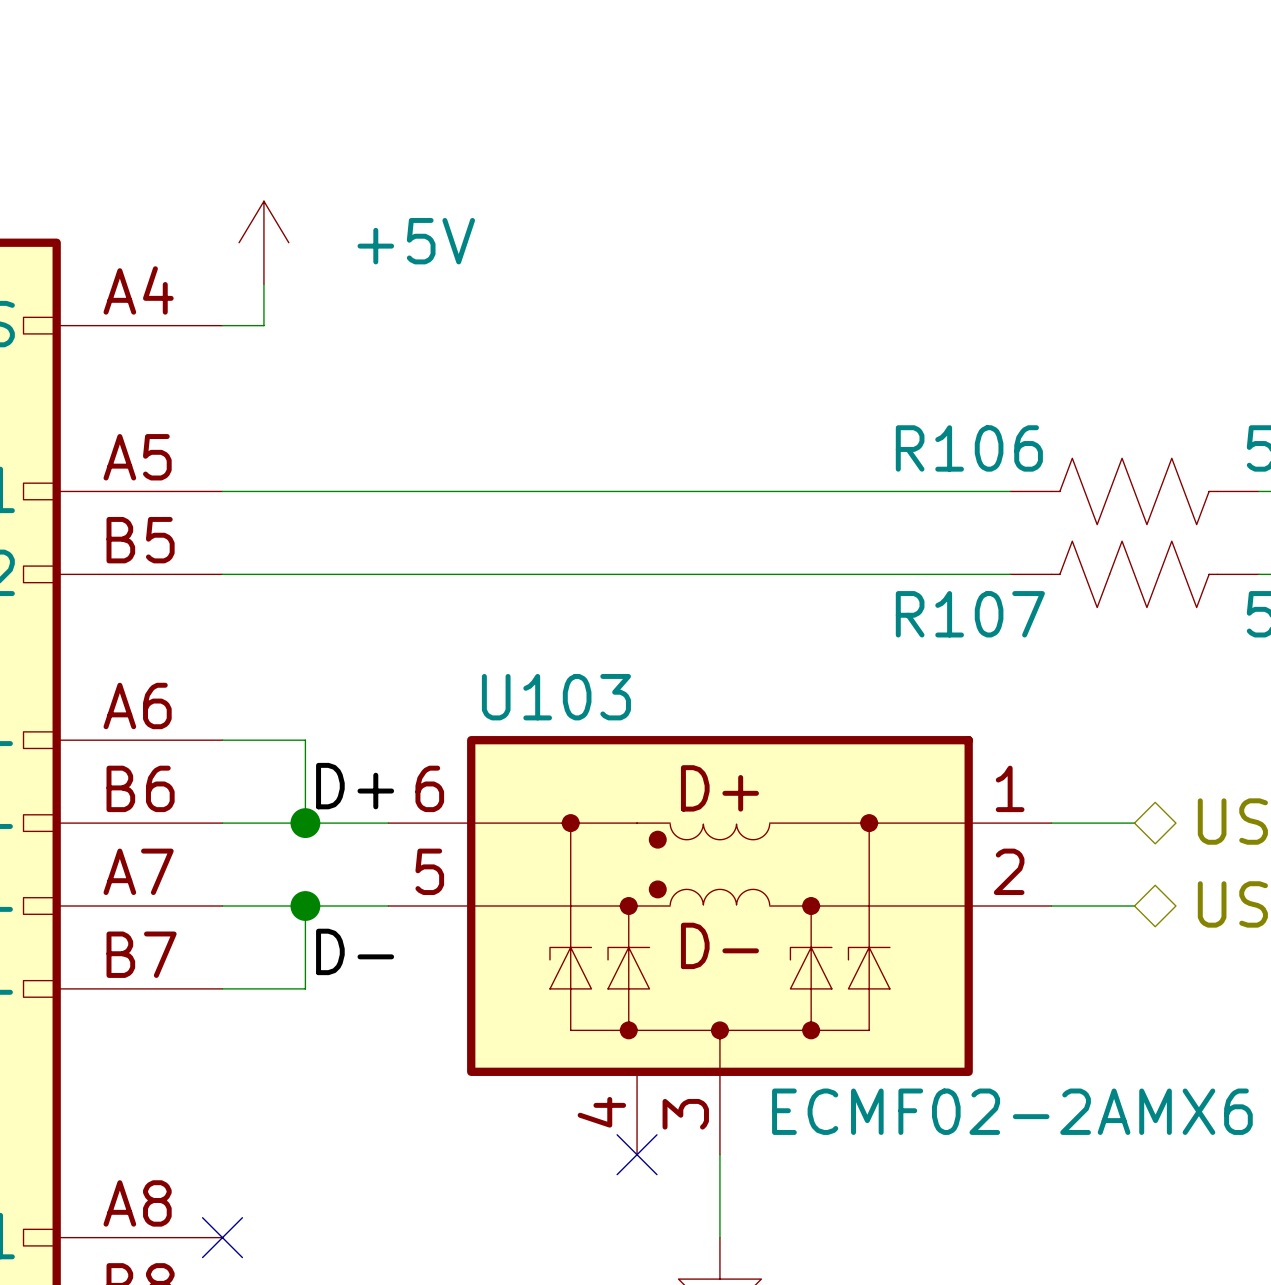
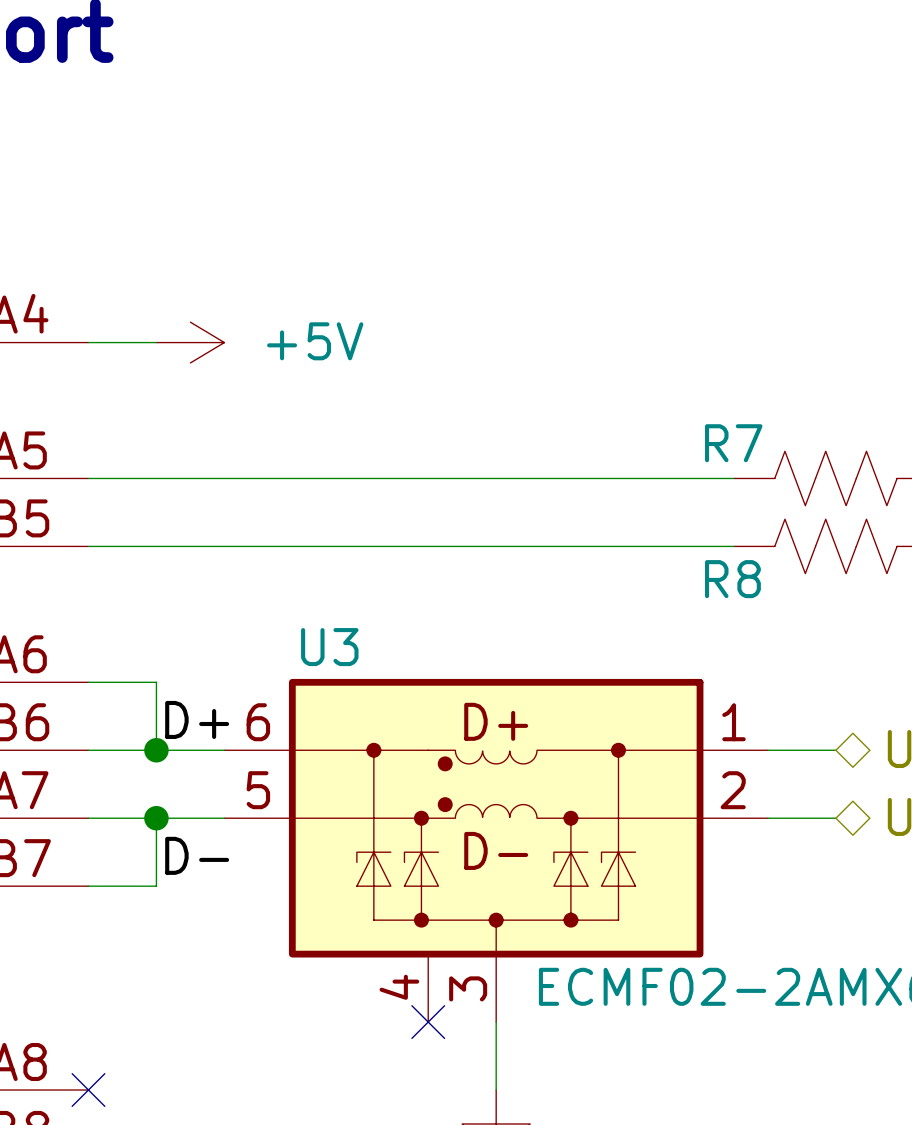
power symbol rotation: 0° (263, 242) -> 90° clockwise (190, 342)
power symbol position: +5V (263, 242) -> +5V (190, 342)
wire: (263, 284) (263, 325) -> (156, 342) (122, 342)
R106 name: R106 (969, 448) -> R7 (733, 443)
R107 name: R107 (970, 614) -> R8 (732, 579)
U103 name: U103 (556, 697) -> U3 (329, 647)

